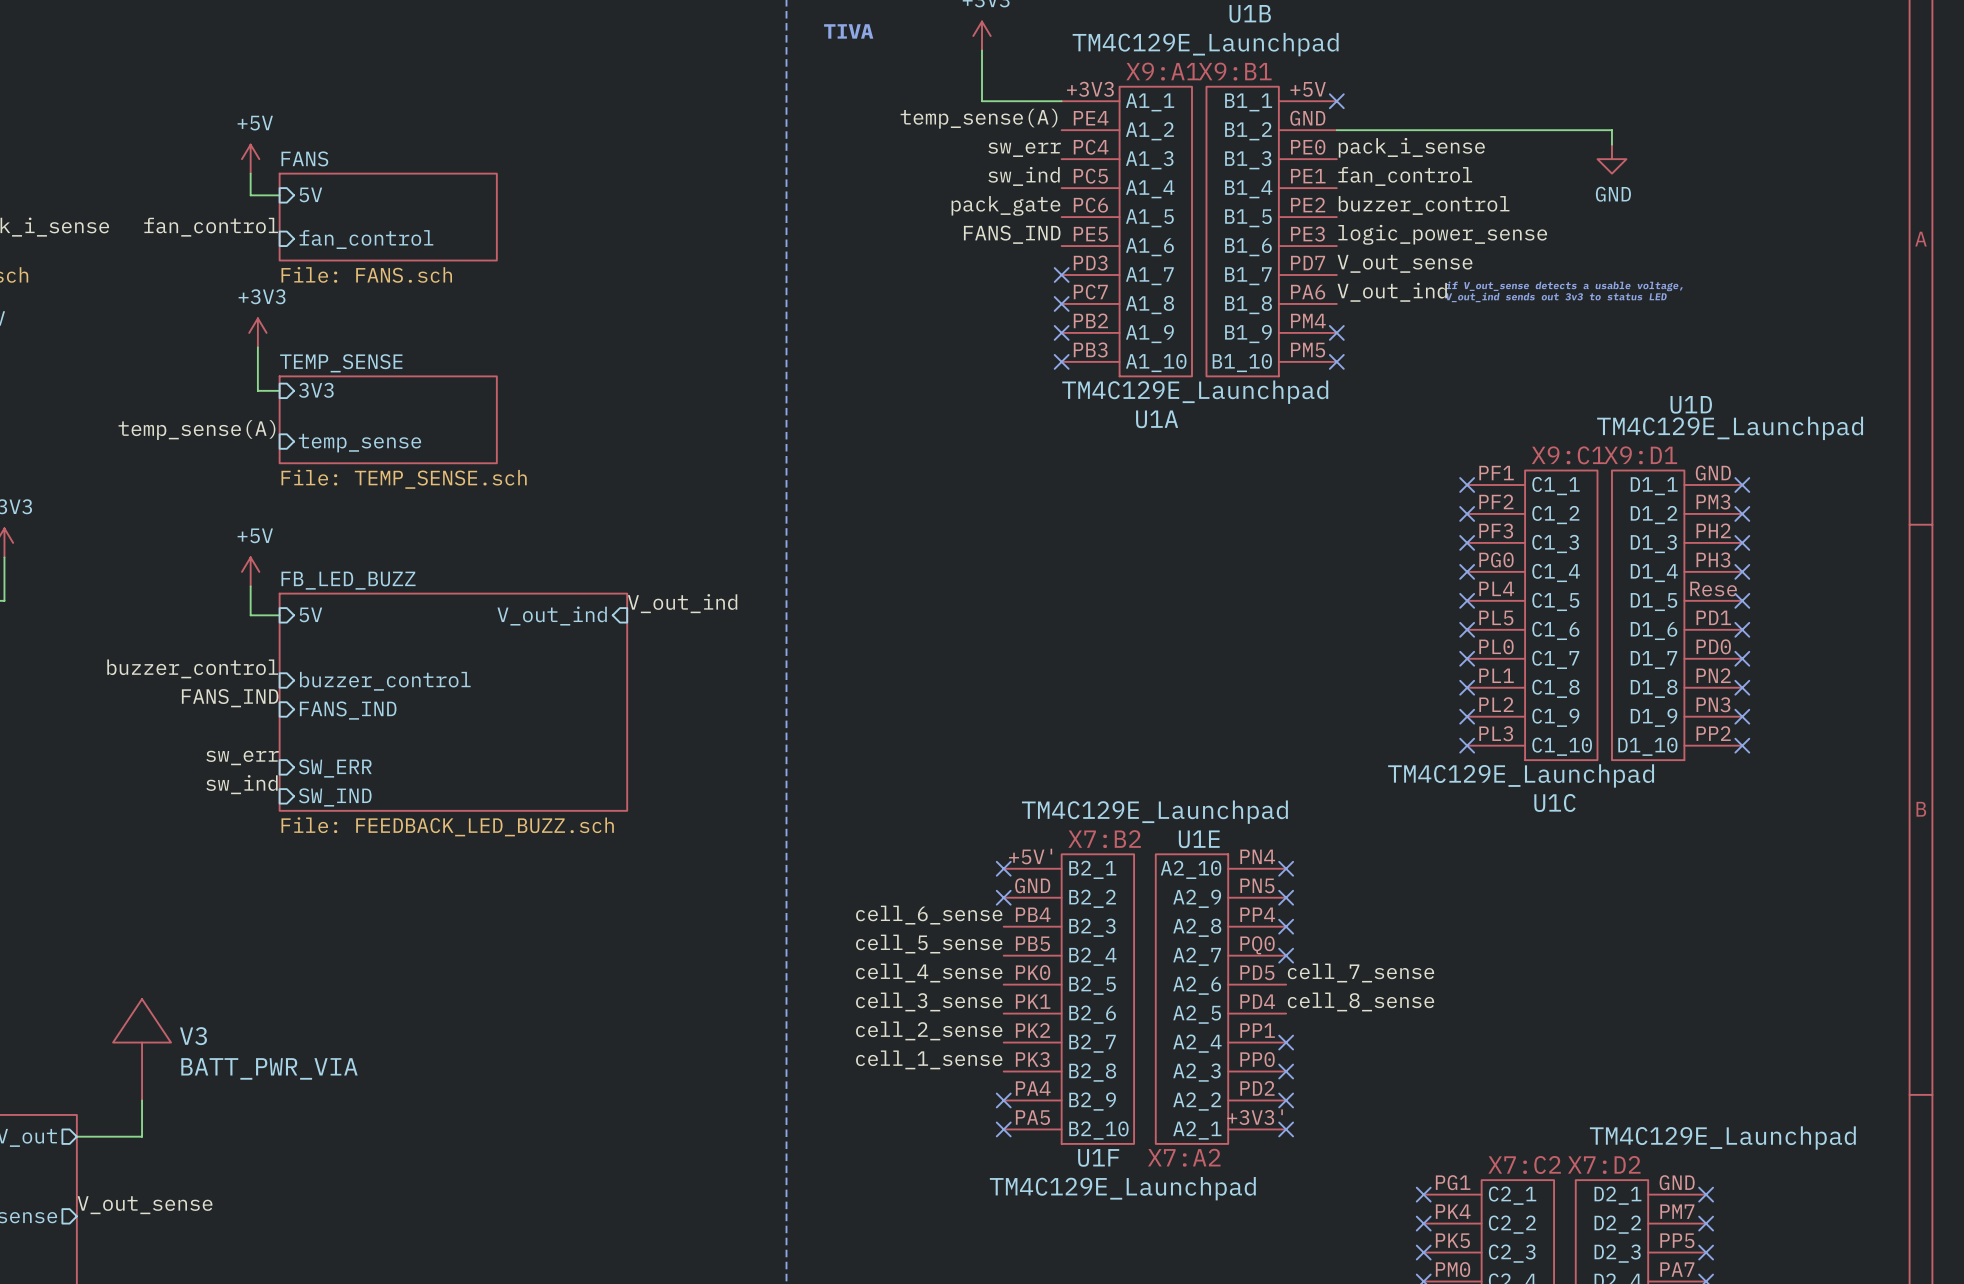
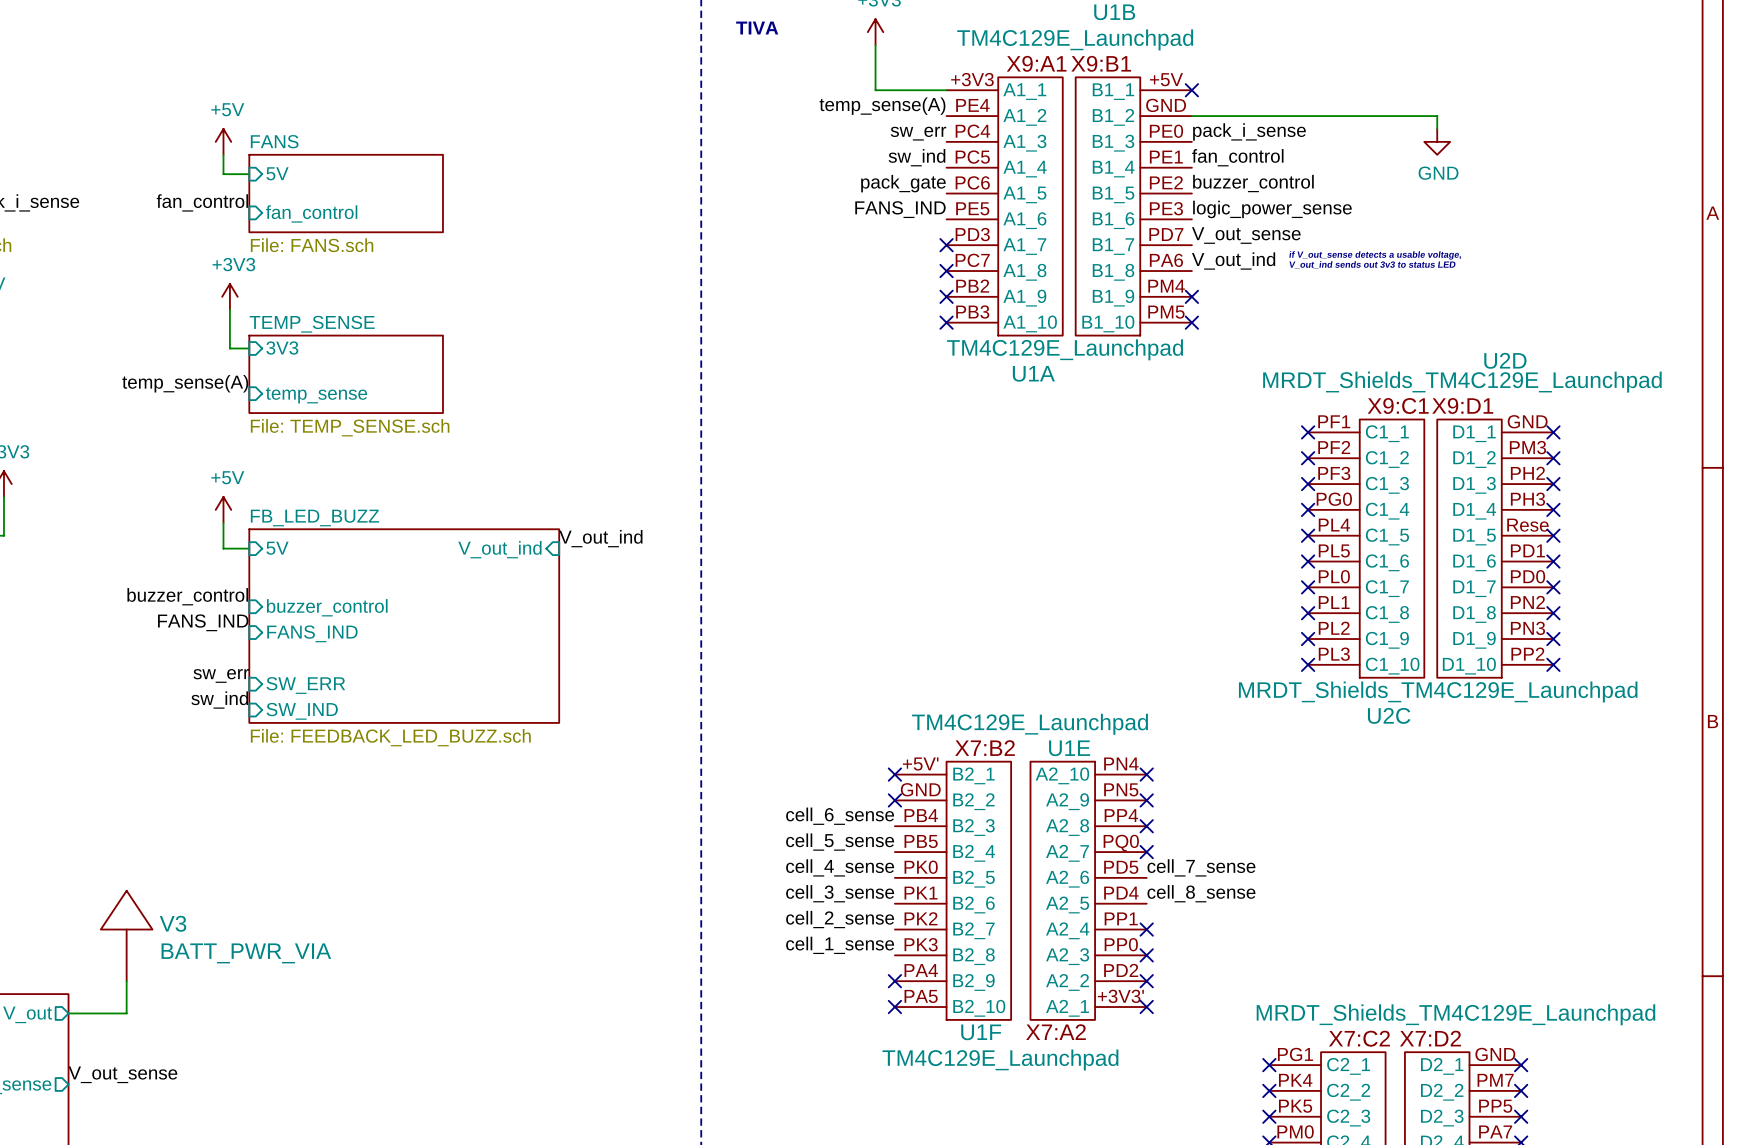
U1D name: U1D (1691, 404) -> U2D (1505, 360)
U1D value: TM4C129E_Launchpad (1730, 428) -> MRDT_Shields_TM4C129E_Launchpad (1462, 382)
U1C value: TM4C129E_Launchpad (1521, 775) -> MRDT_Shields_TM4C129E_Launchpad (1438, 692)
U1C name: U1C (1554, 802) -> U2C (1389, 715)
part value: TM4C129E_Launchpad (1722, 1138) -> MRDT_Shields_TM4C129E_Launchpad (1455, 1014)

